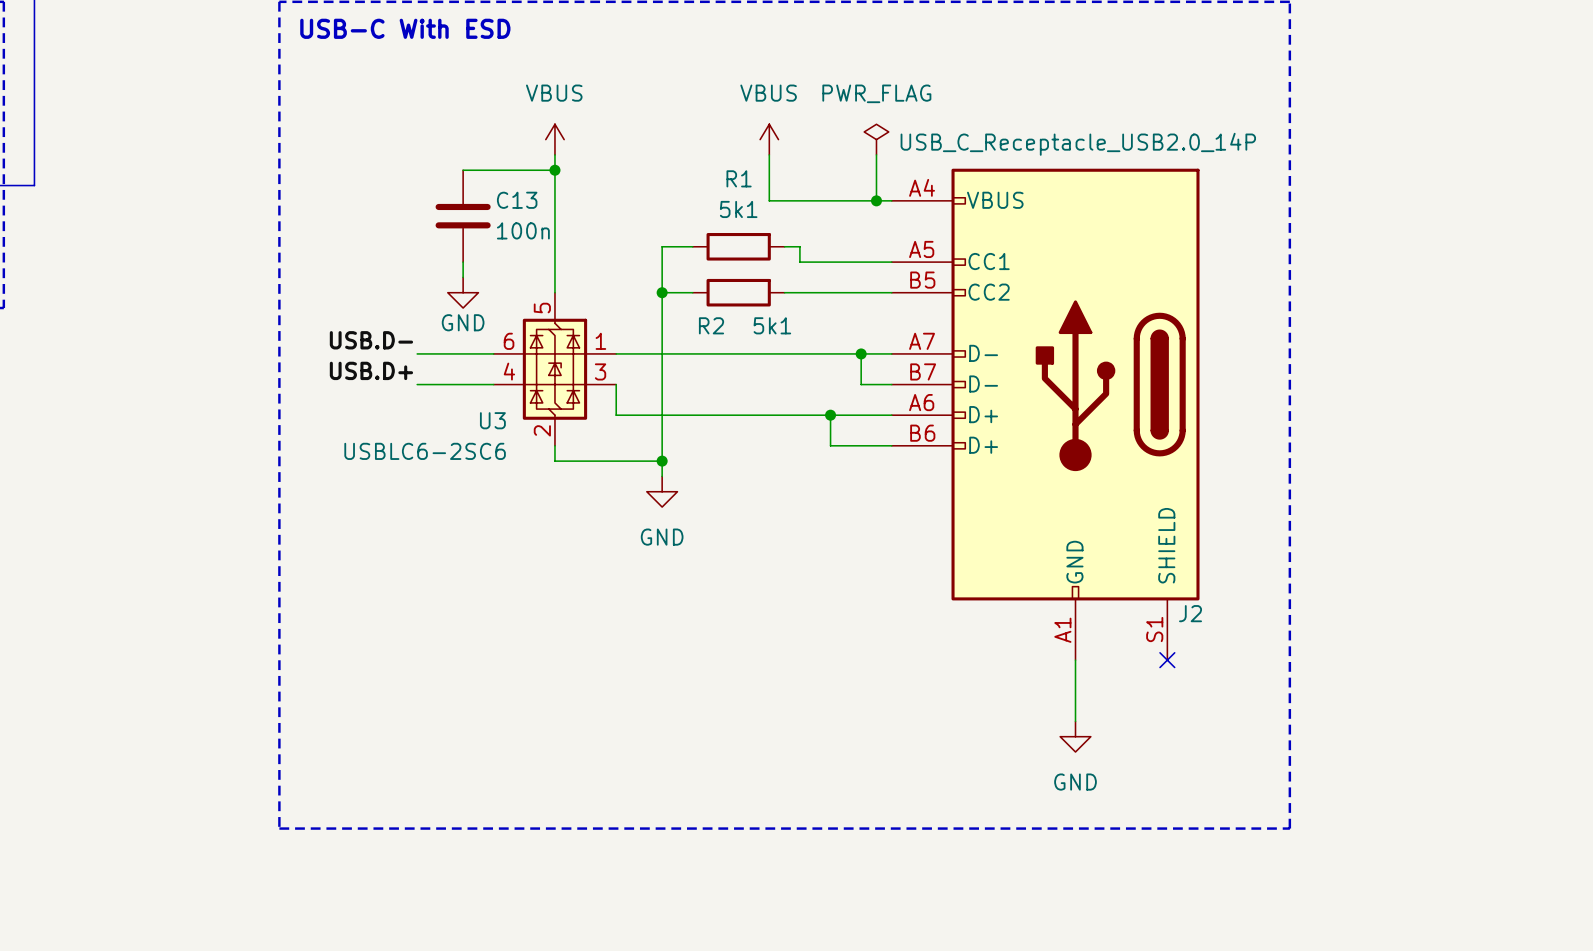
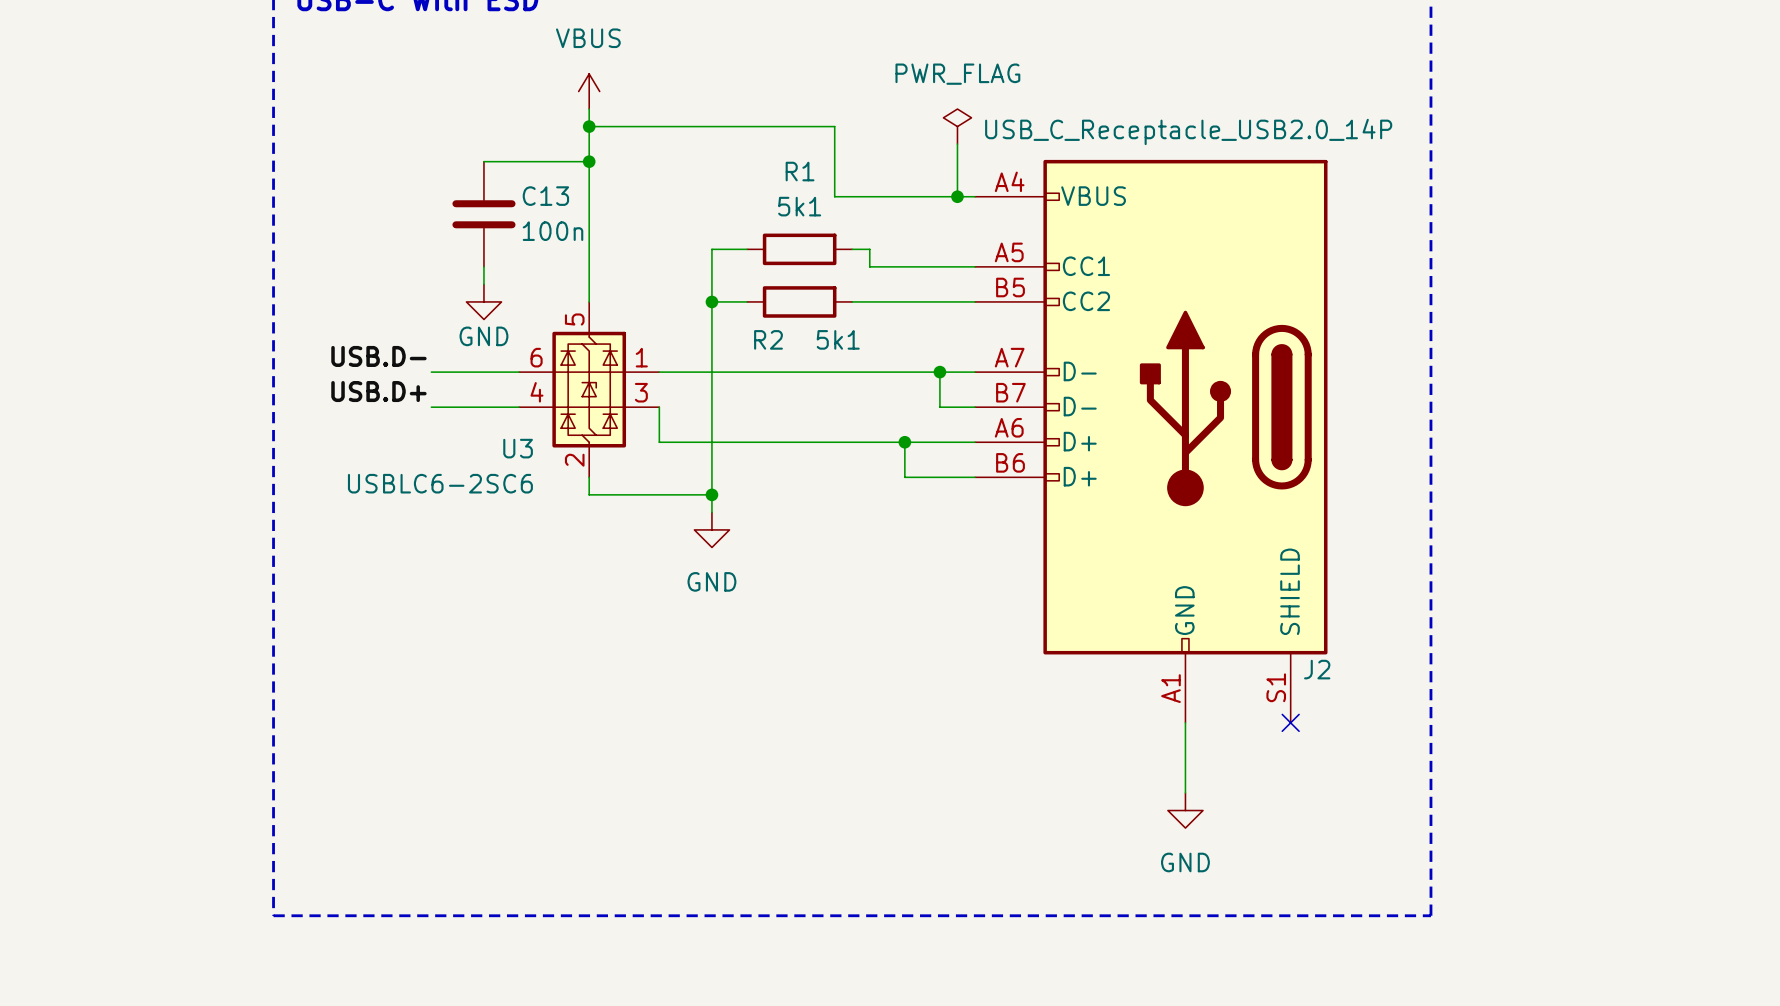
wire: none -> (589, 126) (834, 126) (834, 144)
power symbol position: VBUS (554, 139) -> VBUS (589, 91)
junction: none -> (589, 126)
power symbol: VBUS (769, 139) -> none

